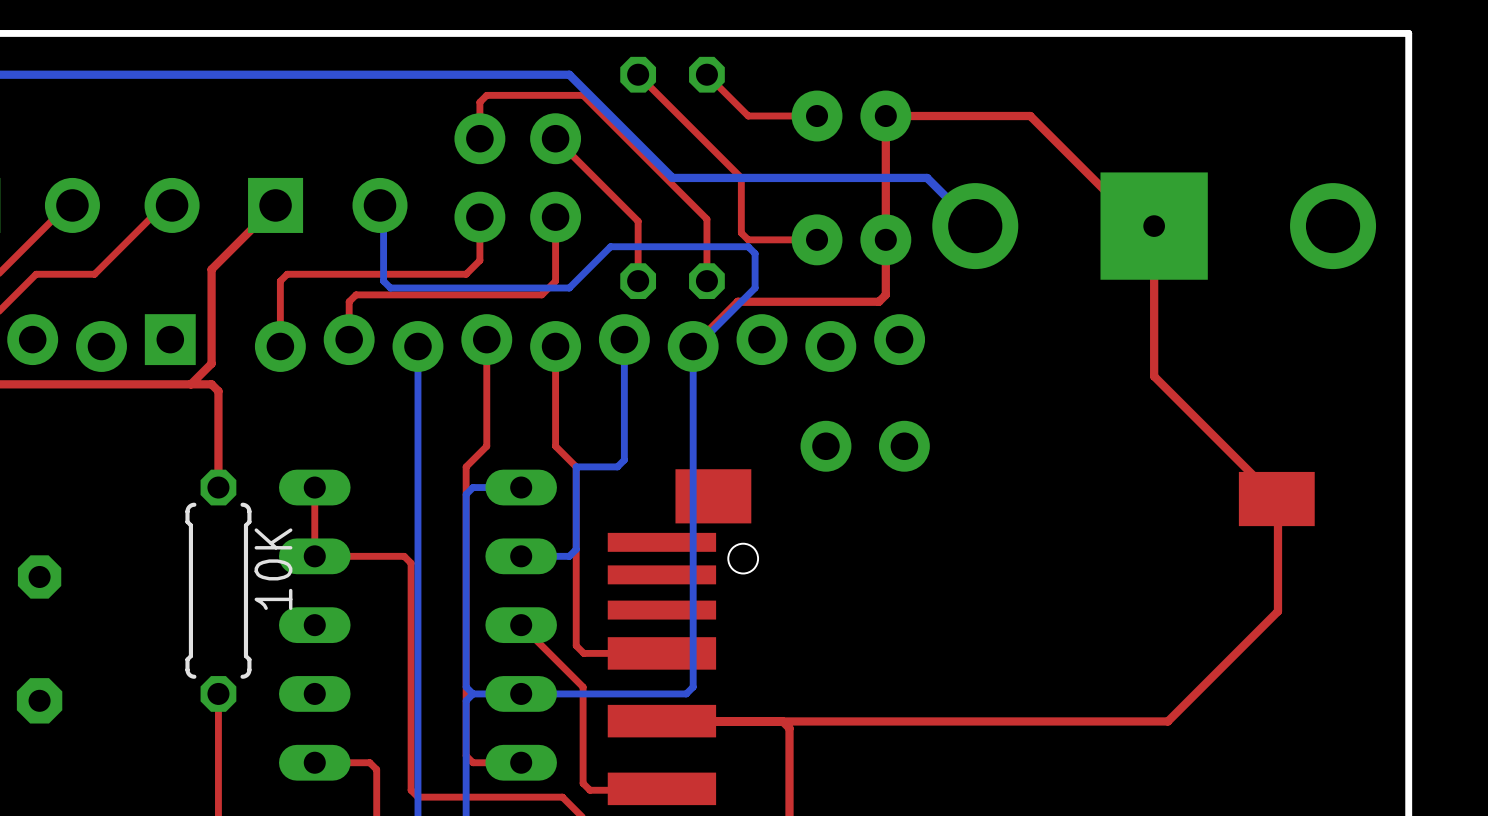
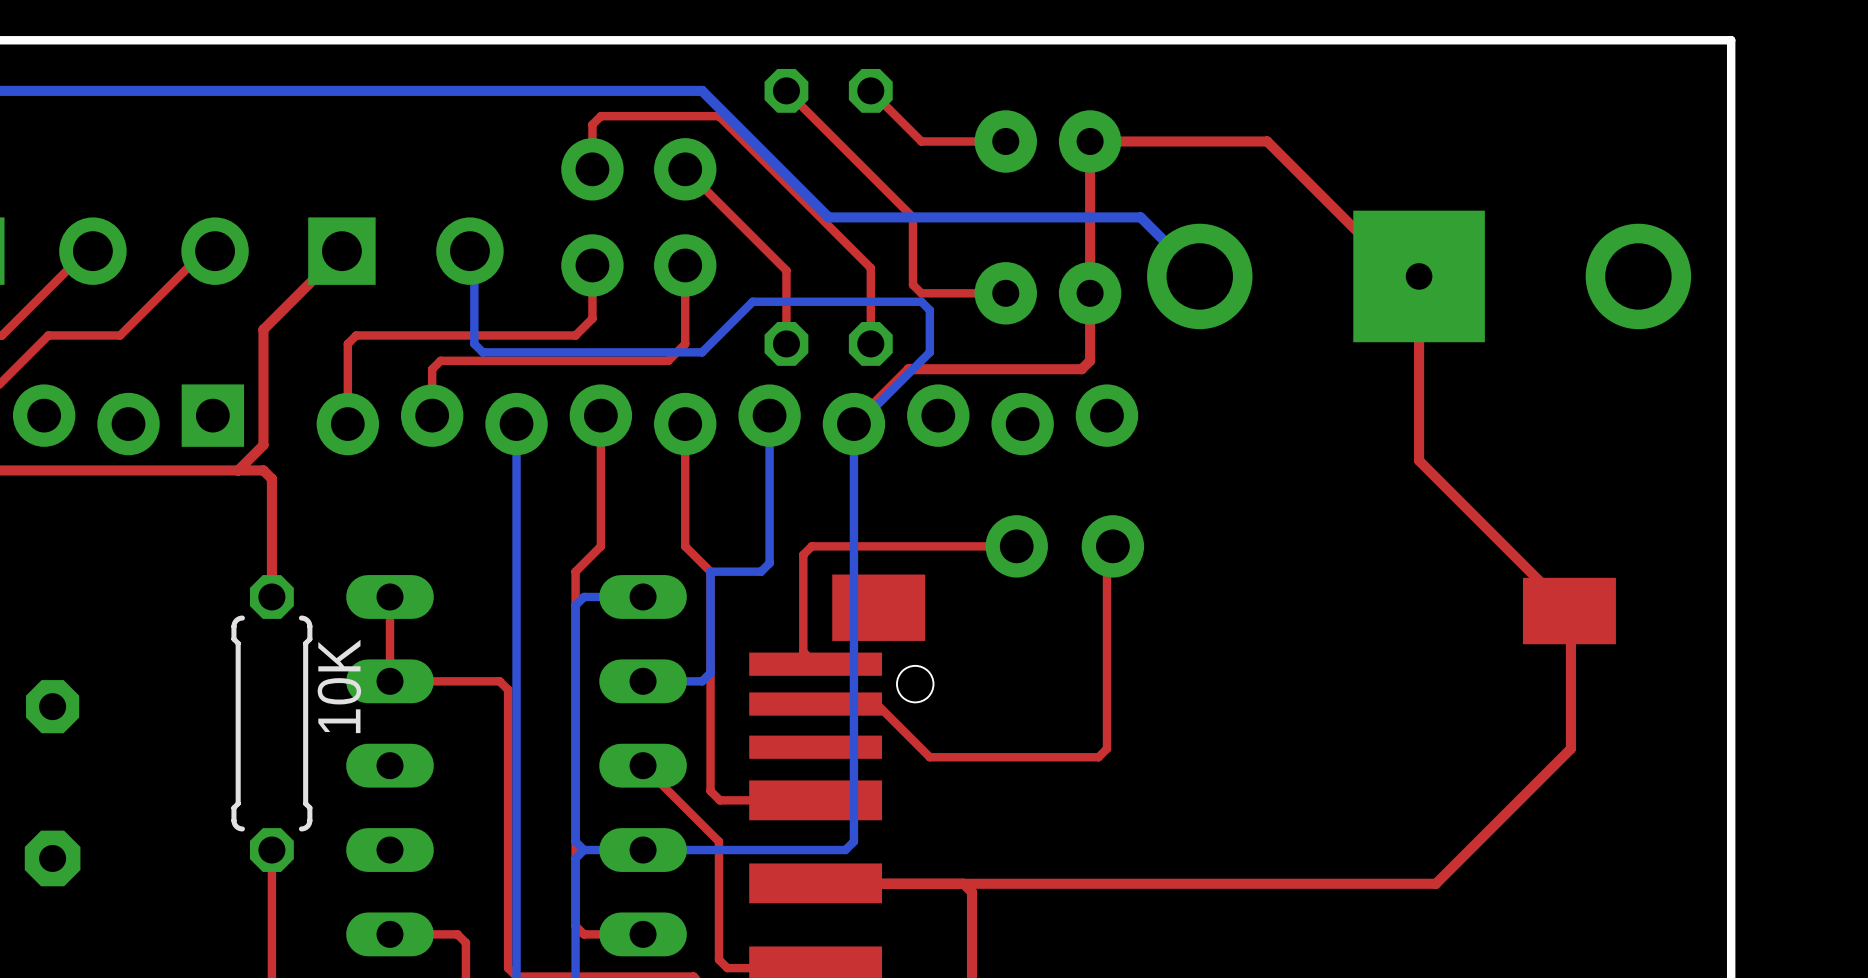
top track: none -> (1016, 546) (811, 546) (803, 554) (803, 651) (815, 664)
top track: none -> (1112, 546) (1106, 552) (1106, 748) (1098, 757) (929, 757) (876, 704) (815, 704)

